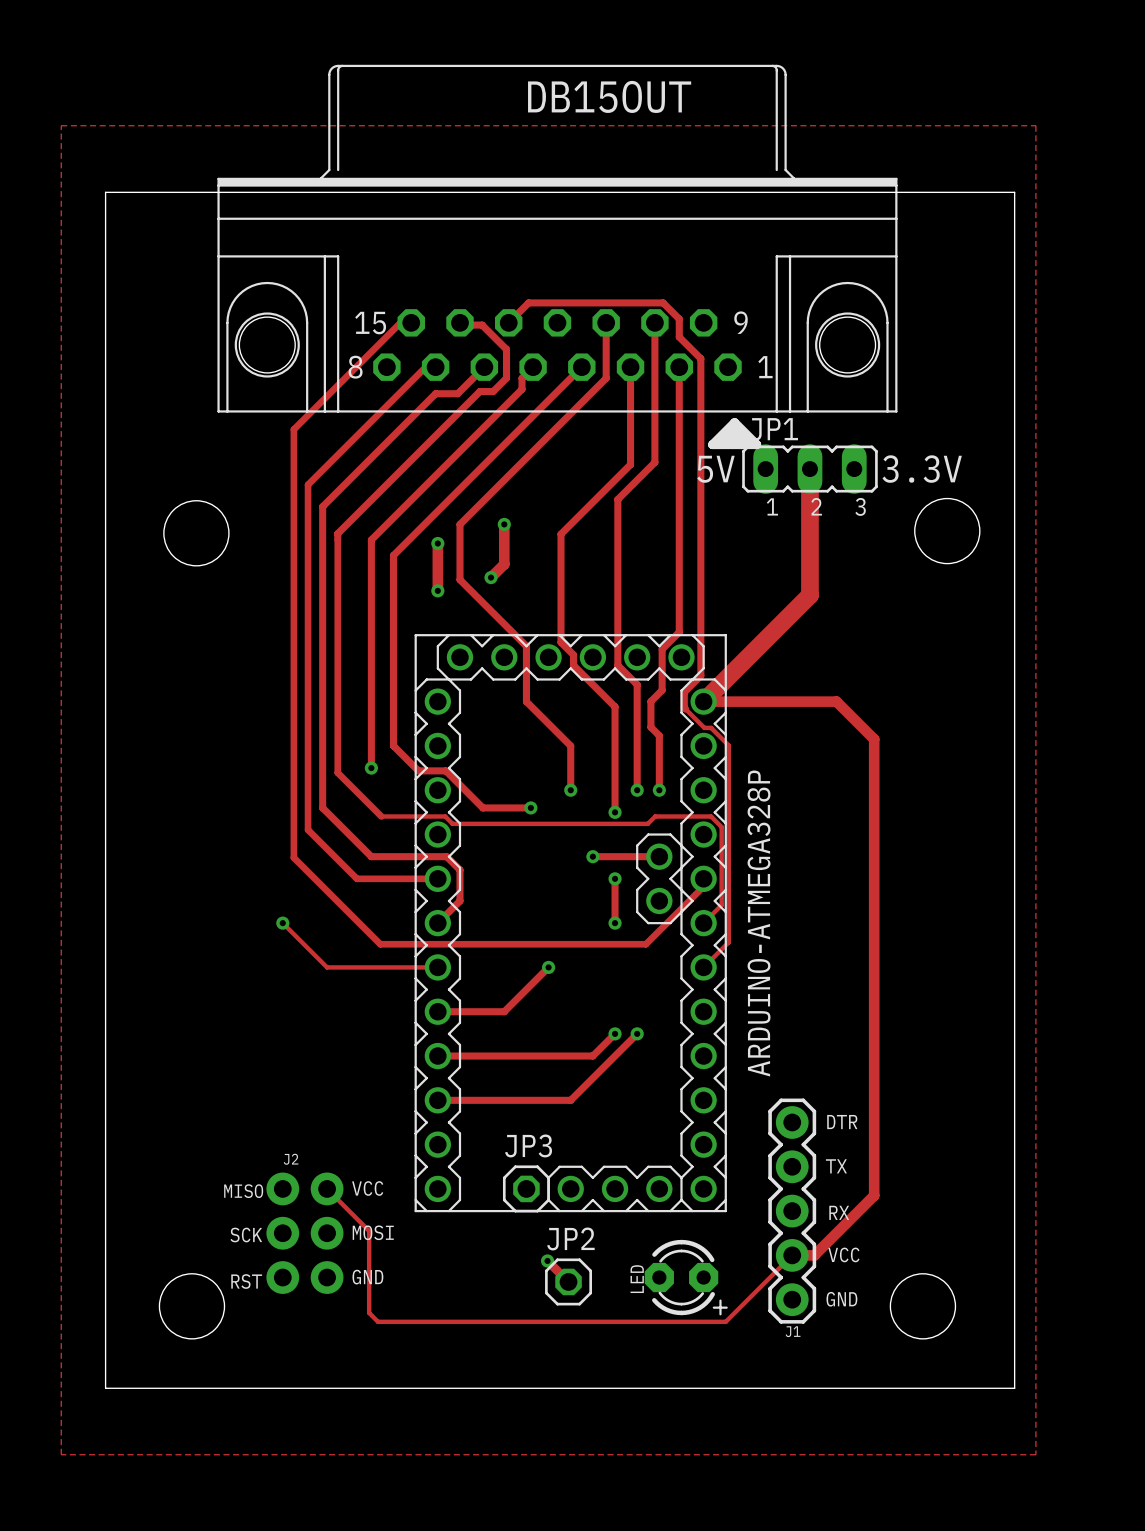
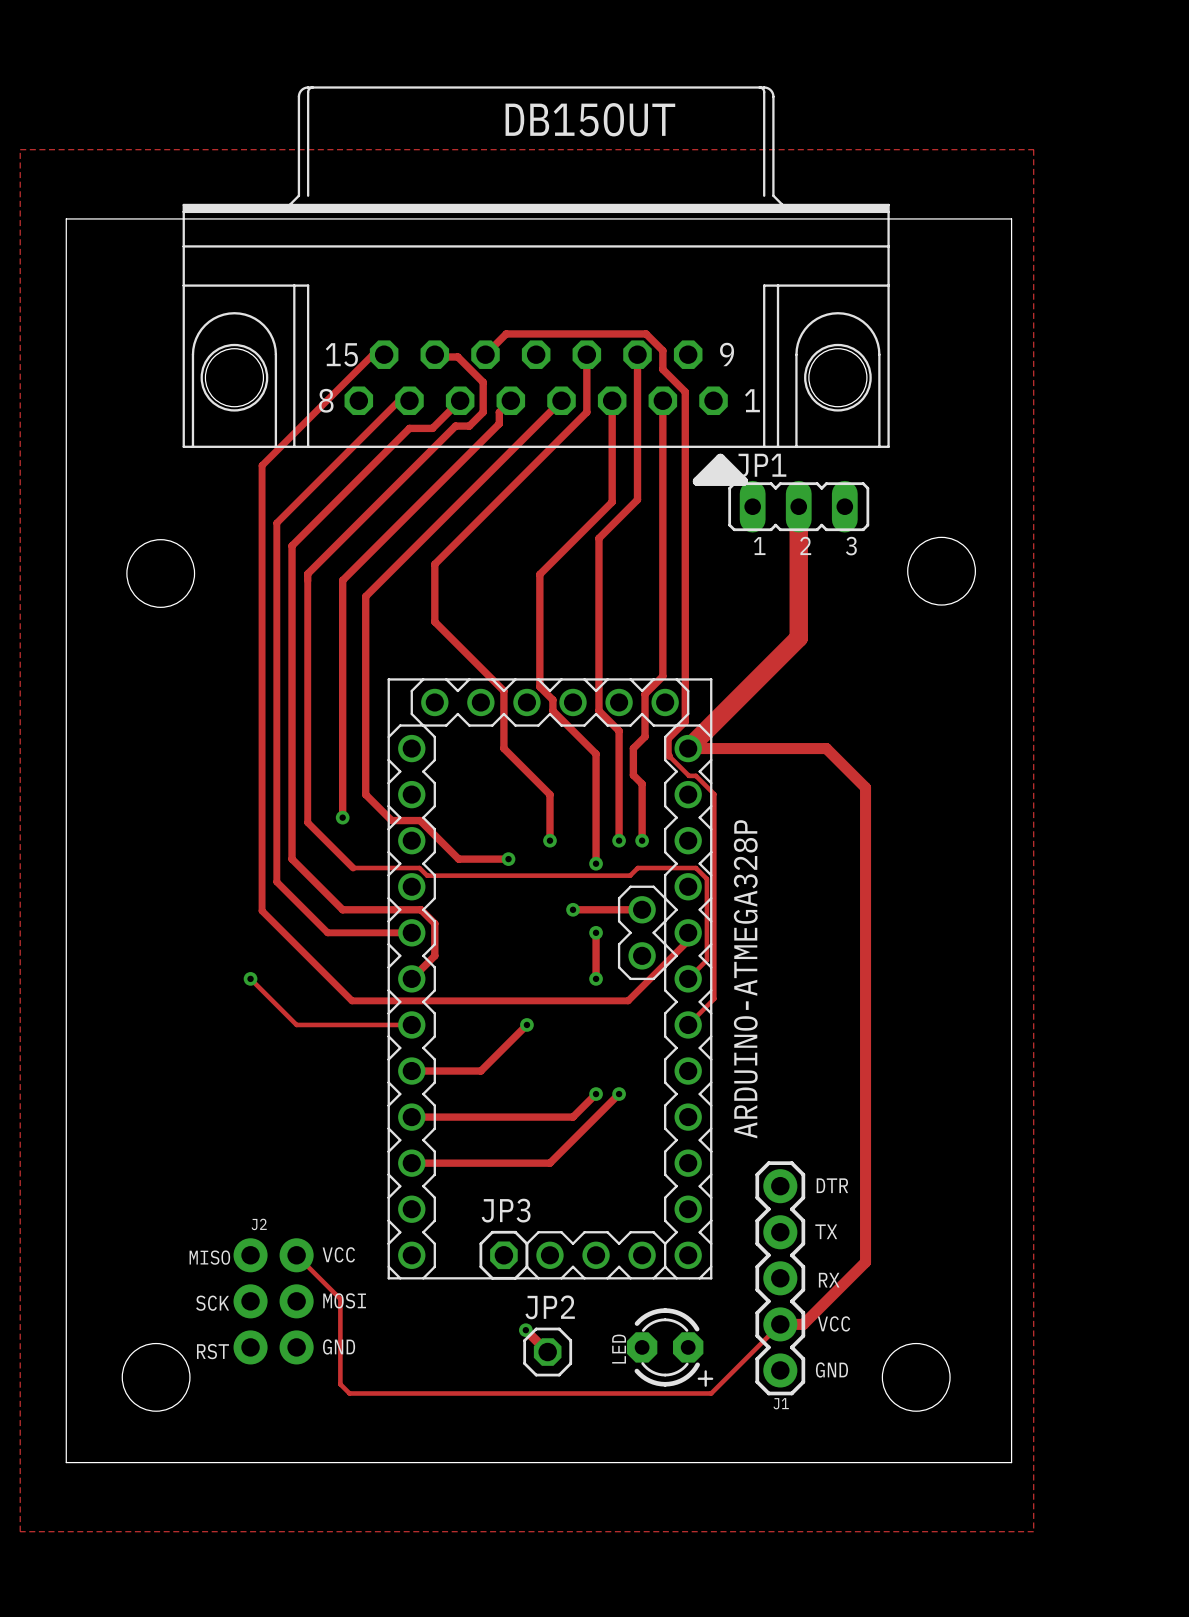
text: 5V (715, 469) -> none
text: 3.3V (922, 469) -> none
track: (504, 524) (504, 564) (491, 577) -> none
via: (504, 524) -> none
track: (437, 543) (437, 590) -> none
via: (437, 543) -> none
via: (491, 577) -> none
via: (437, 590) -> none

